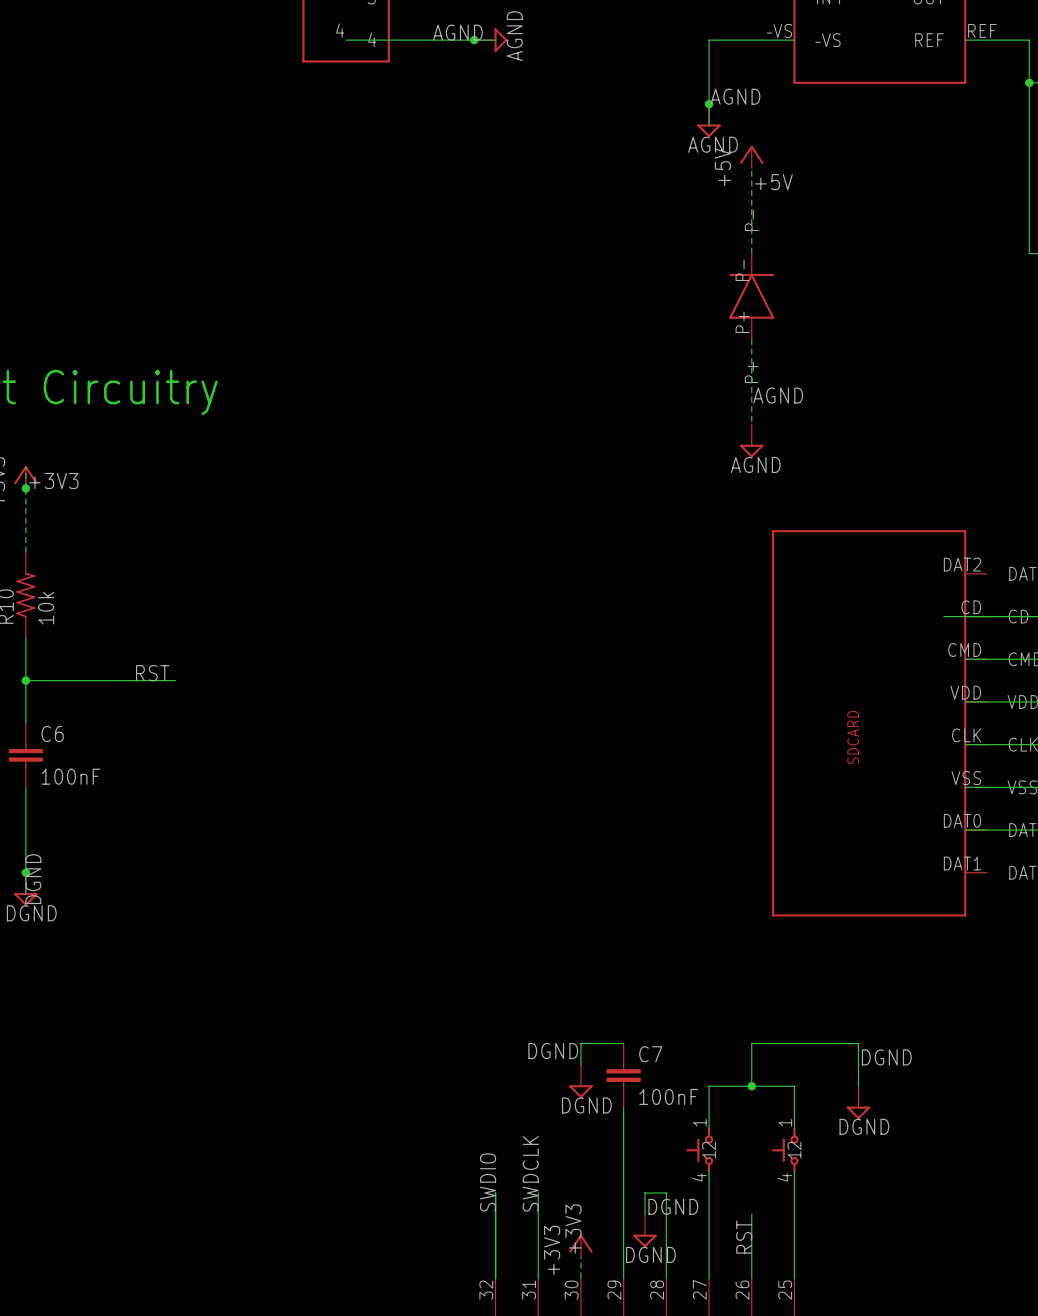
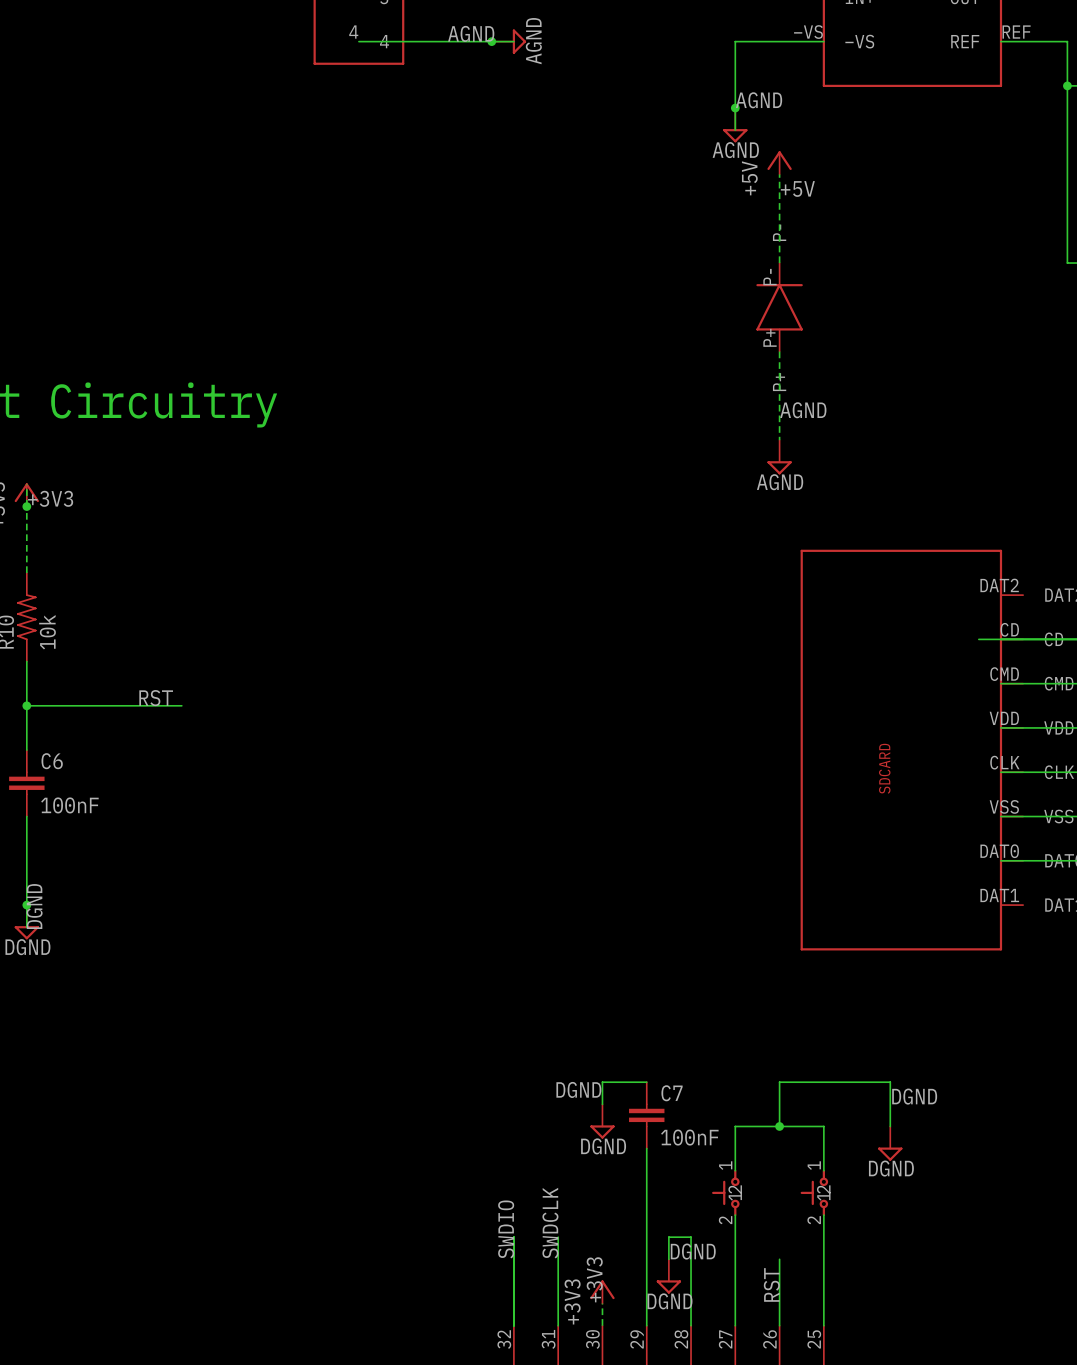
part pin number: 4 (699, 1177) -> 2 (725, 1220)
part pin number: 4 (784, 1177) -> 2 (814, 1220)

